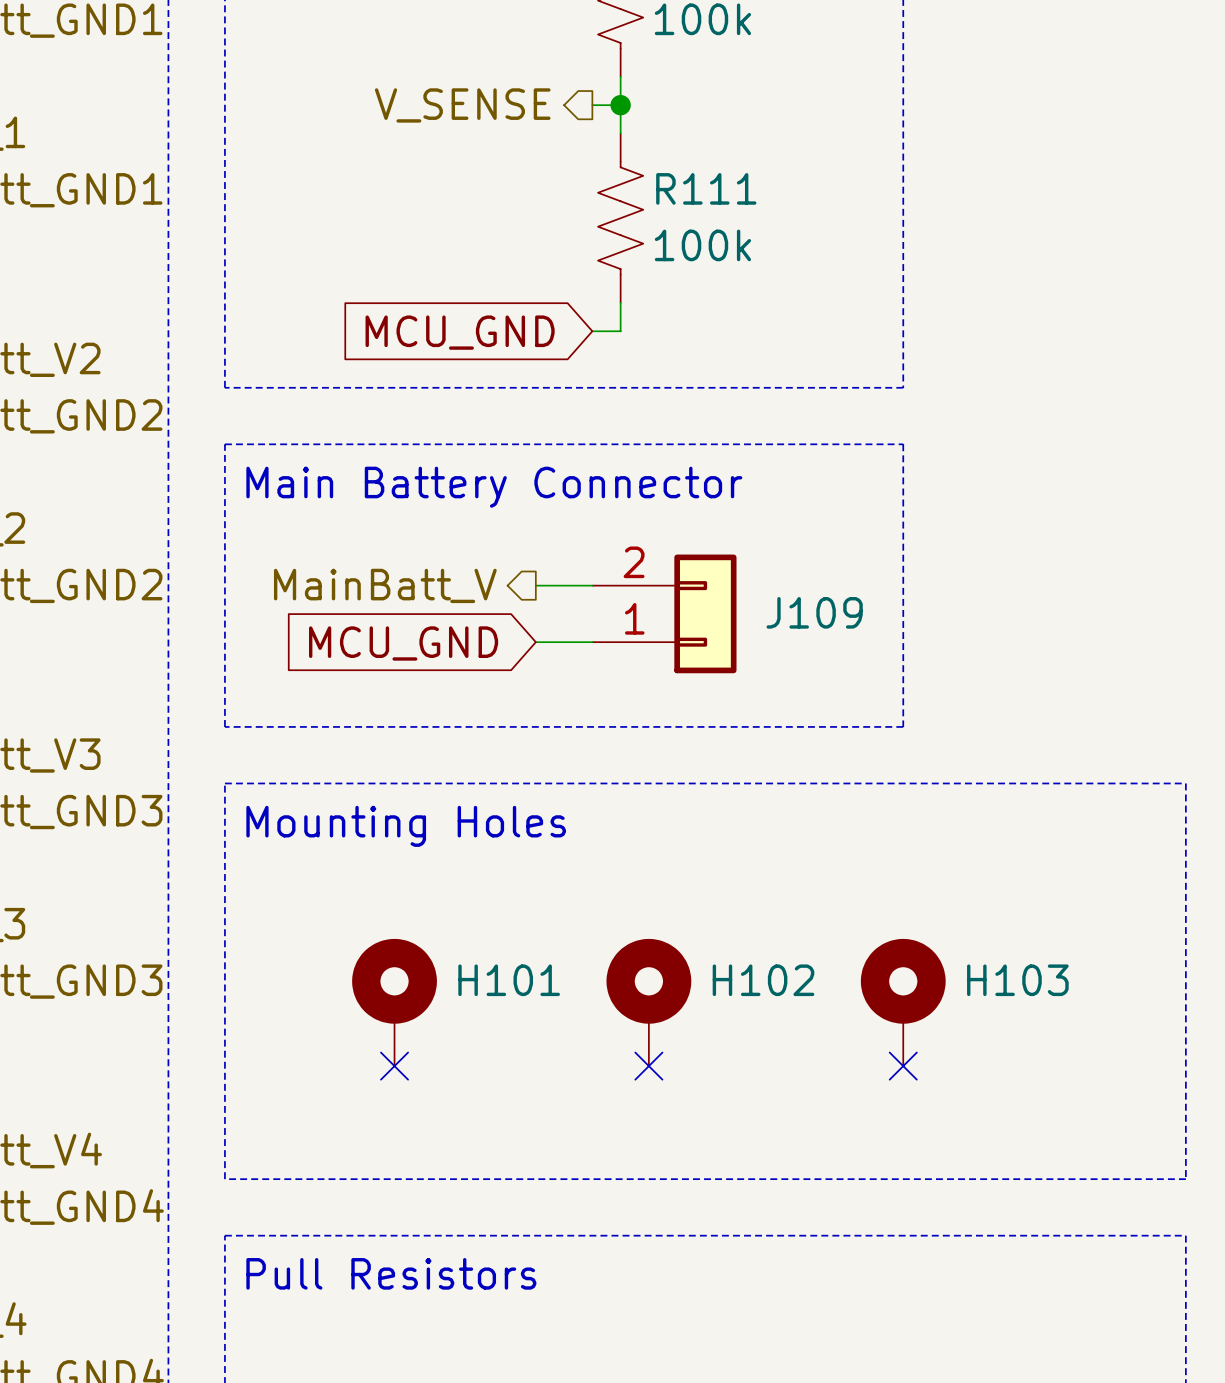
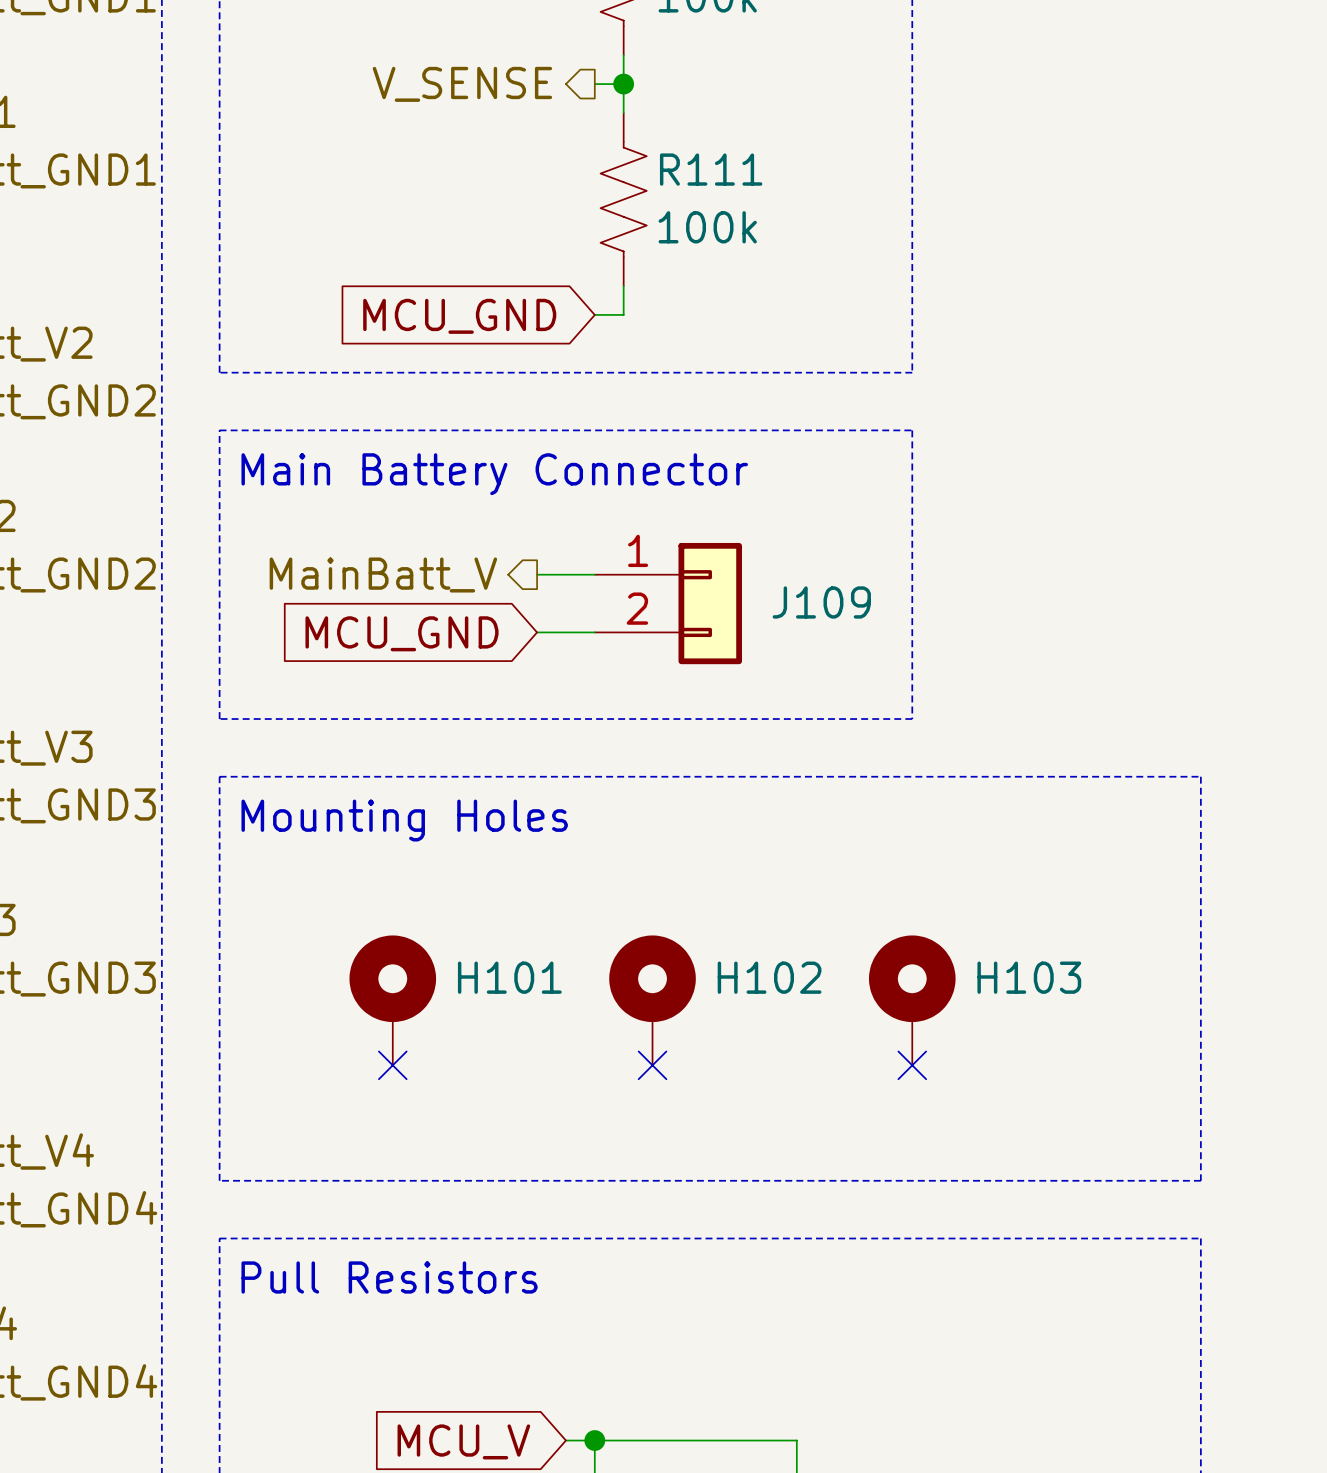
J109 flip: as is (705, 613) -> up-down (710, 603)

